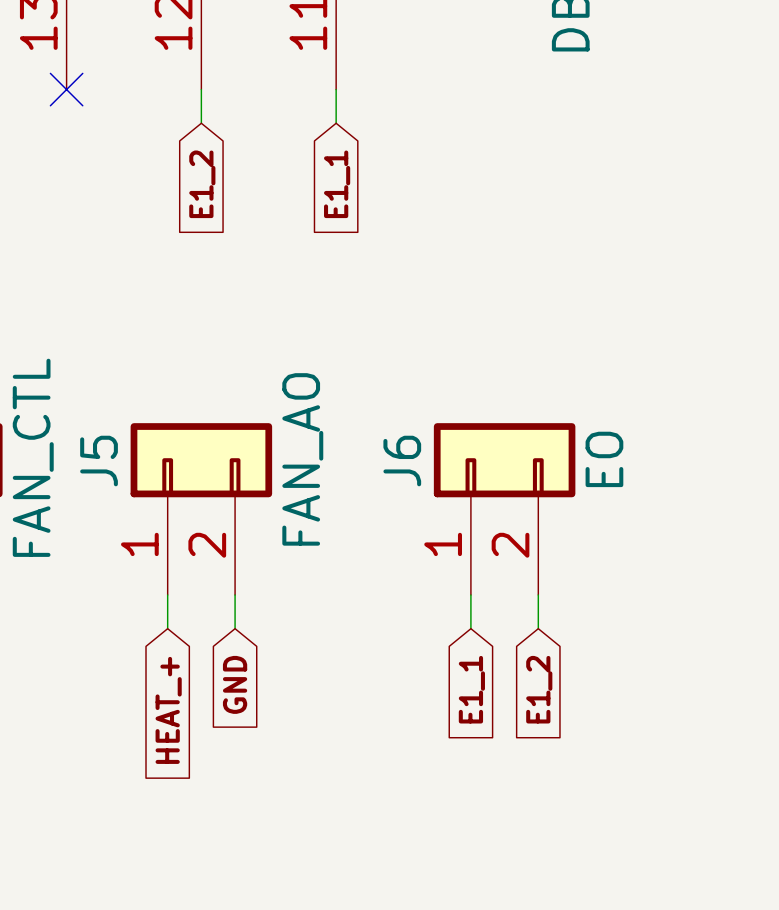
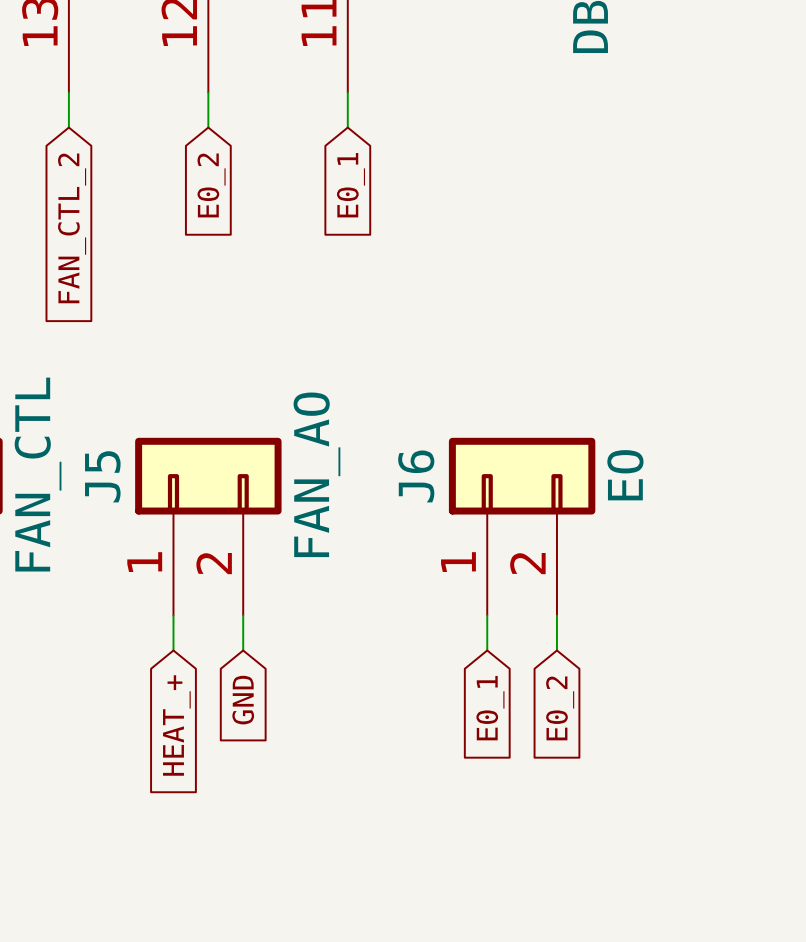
wire: none -> (68, 92) (68, 127)
no-connect mark: (66, 89) -> none
global label: E1_2 (202, 184) -> E0_2 (211, 185)
global label: E1_1 (337, 184) -> E0_1 (350, 185)
global label: none -> FAN_CTL_2 (72, 228)
global label: E1_1 (471, 689) -> E0_1 (490, 708)
global label: E1_2 (539, 689) -> E0_2 (560, 708)

